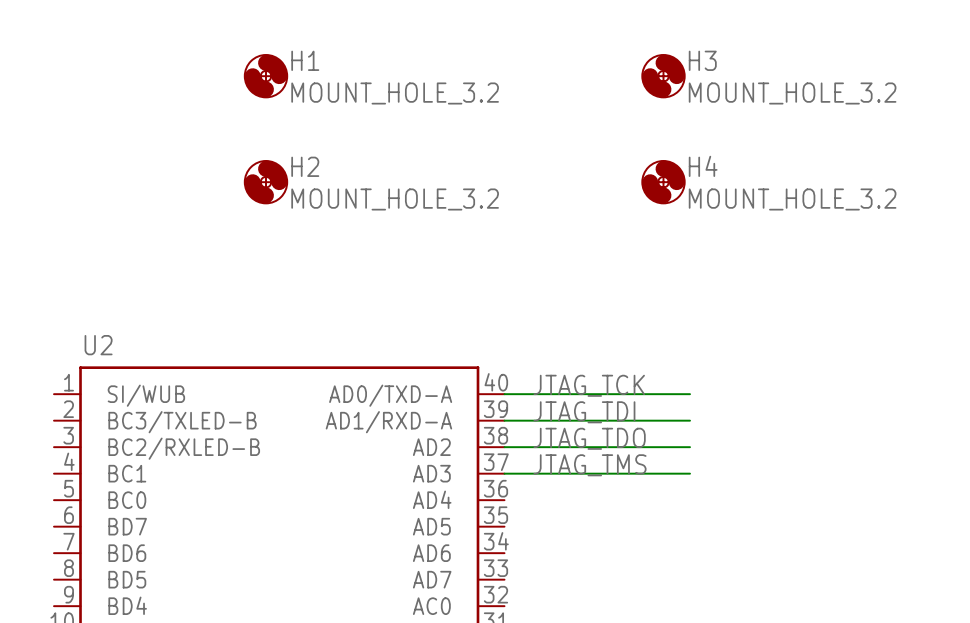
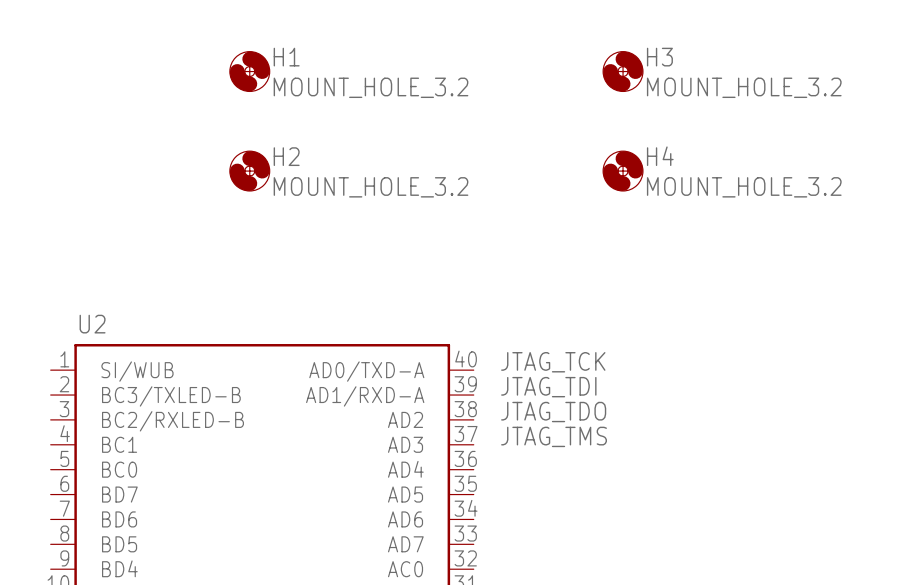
wire: (504, 394) (689, 394) -> none
wire: (504, 420) (689, 420) -> none
wire: (504, 447) (689, 447) -> none
wire: (504, 473) (689, 473) -> none

